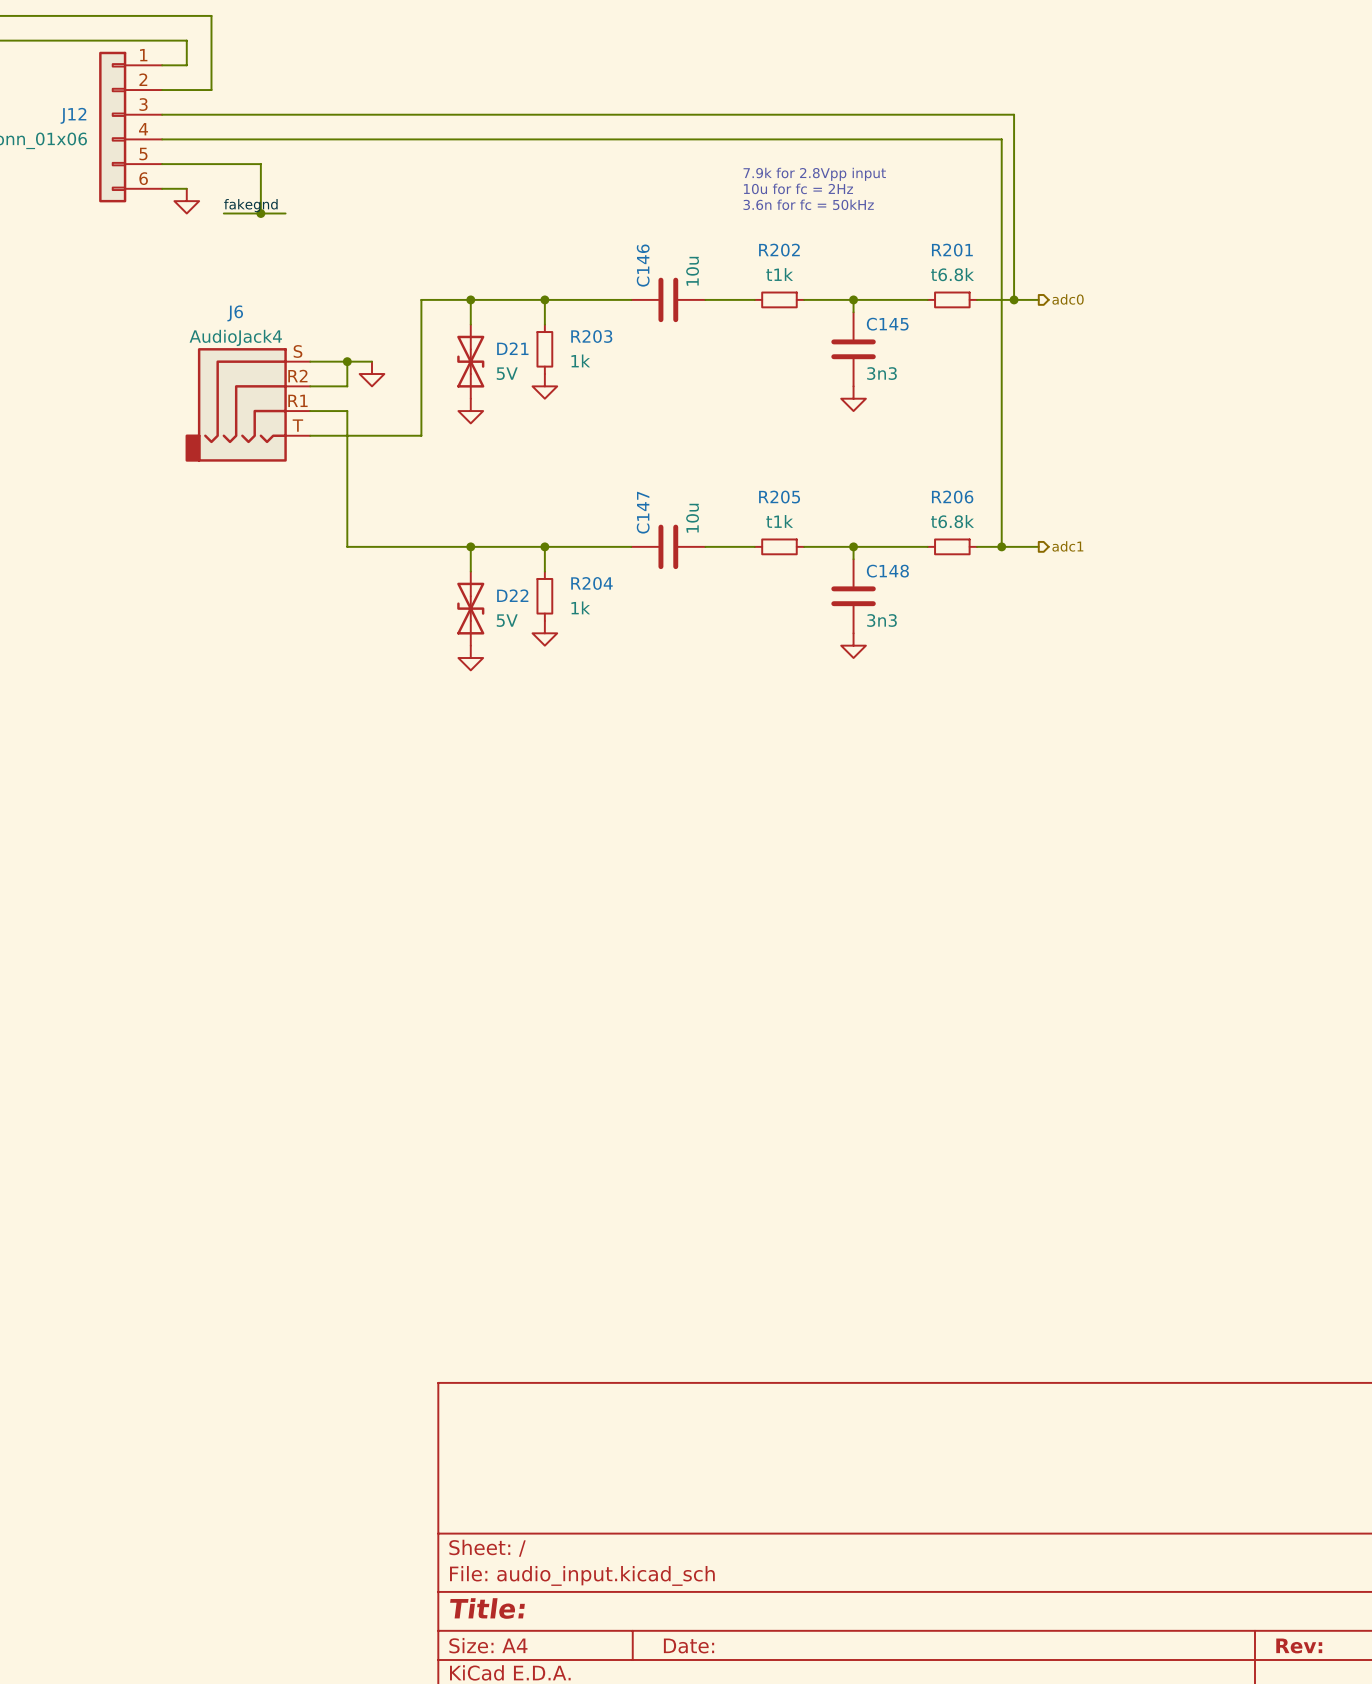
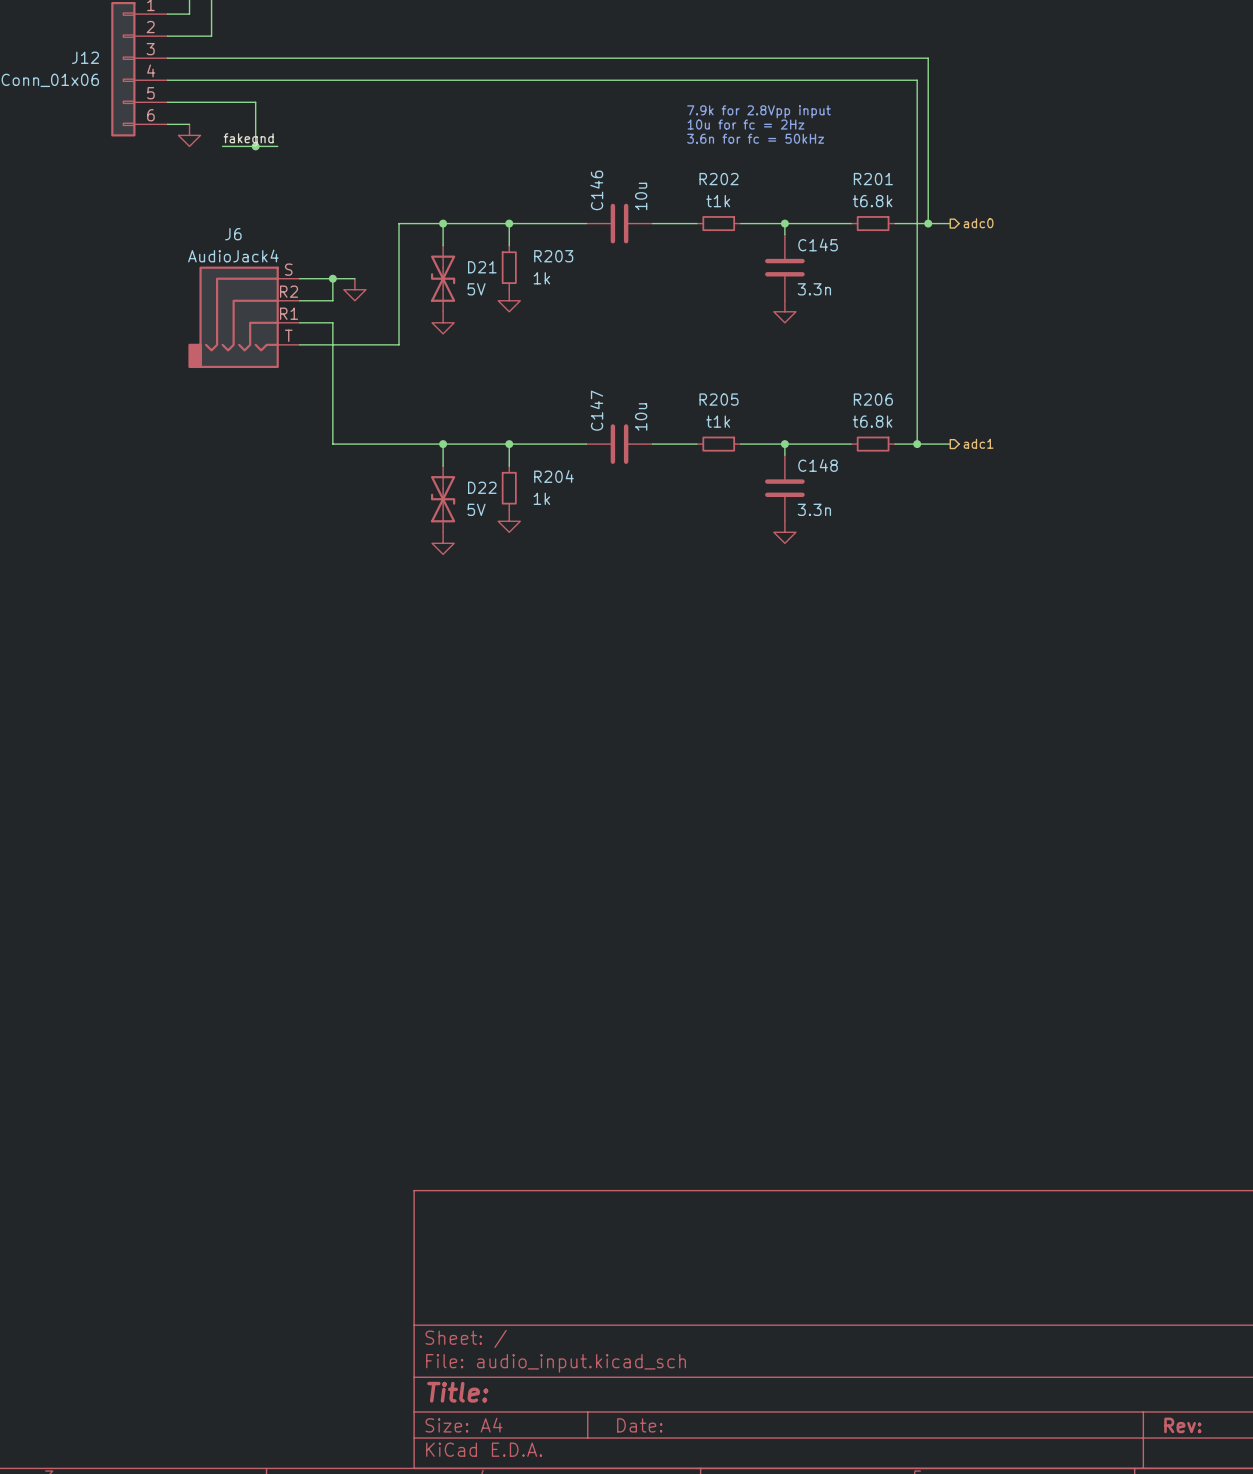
C145 value: 3n3 (882, 373) -> 3.3n (814, 289)
C148 value: 3n3 (882, 620) -> 3.3n (814, 509)

